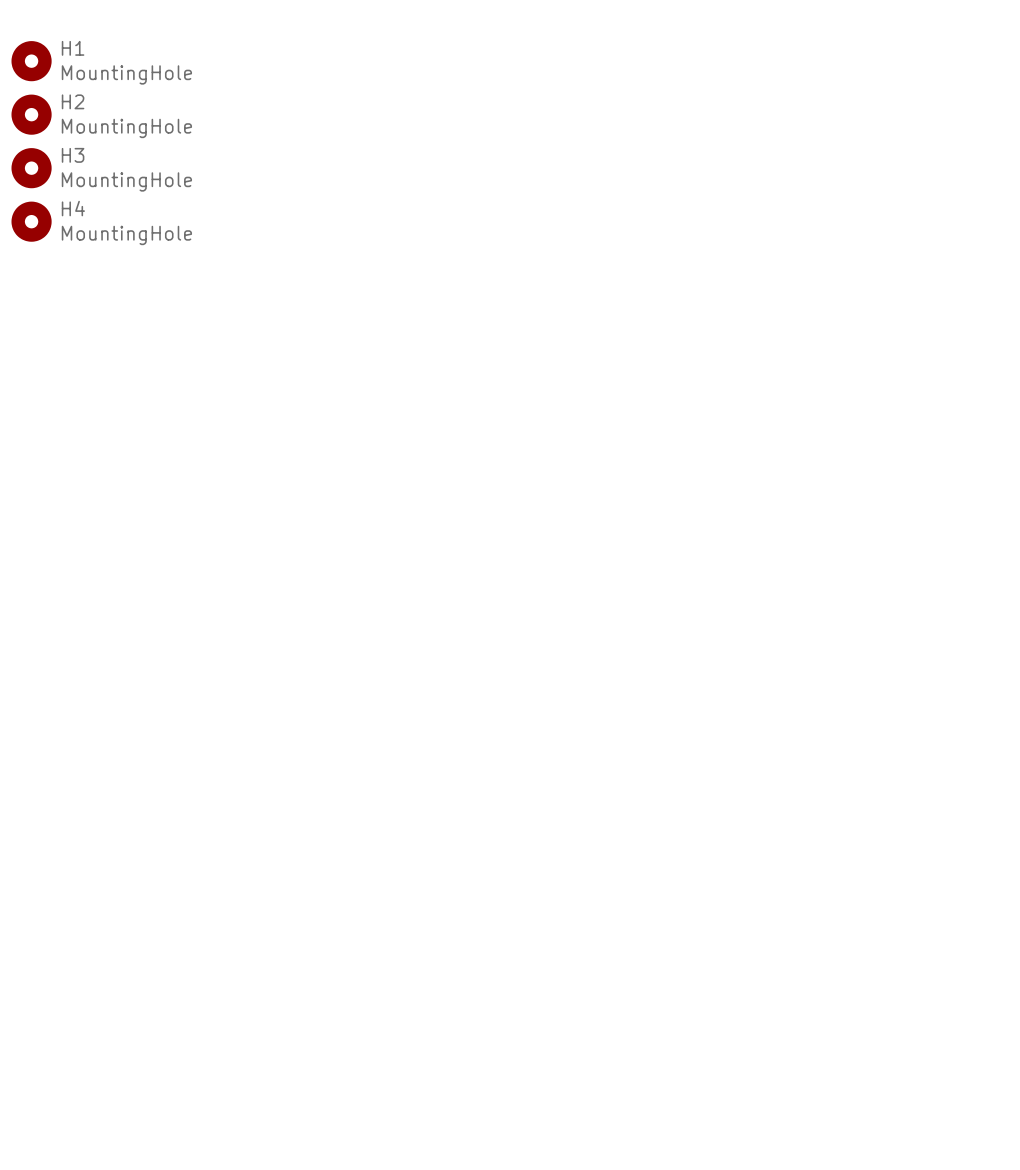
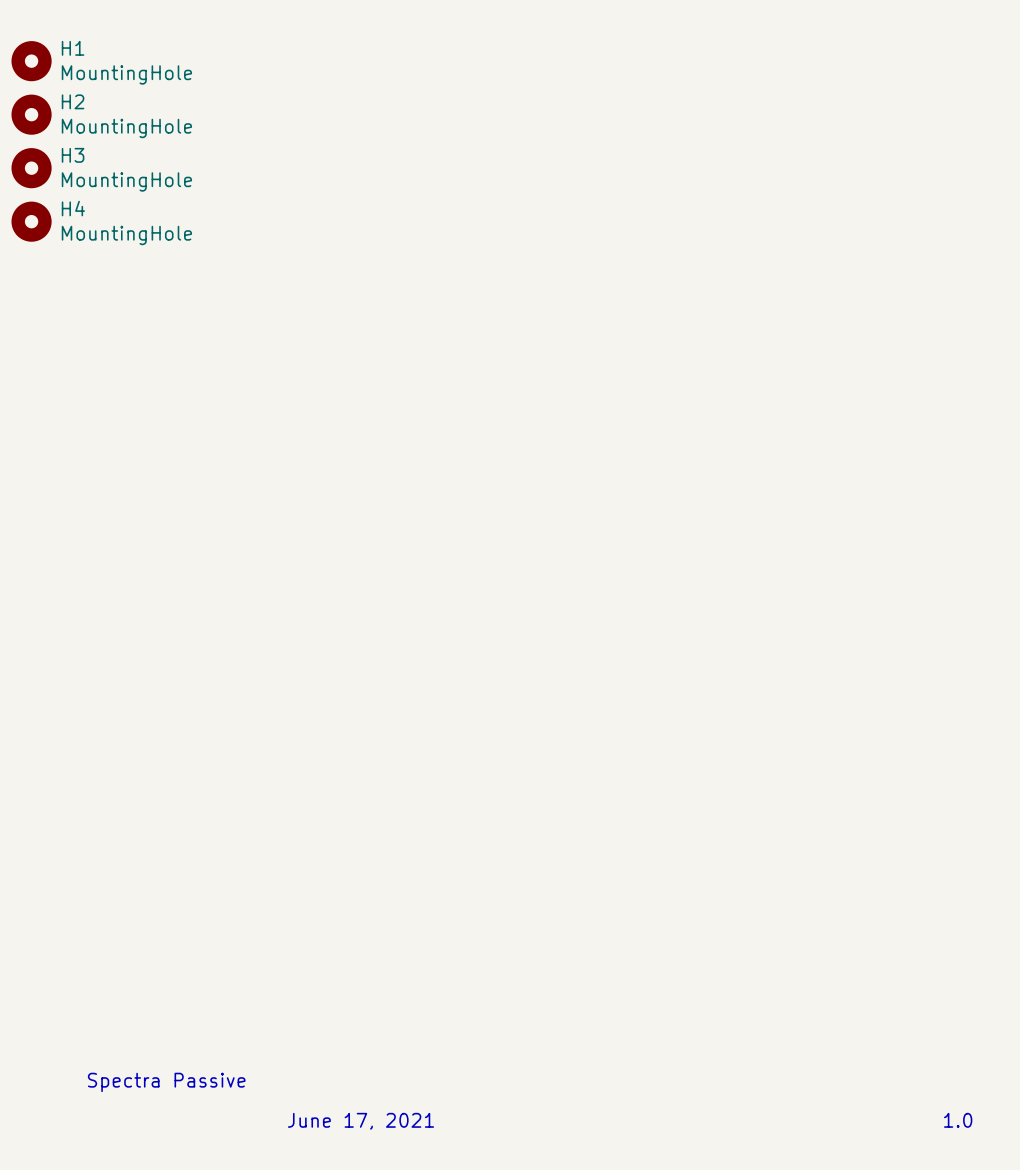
text: none -> Spectra Passive (166, 1082)
text: none -> 1.0 (958, 1120)
text: none -> June 17, 2021 (360, 1121)

